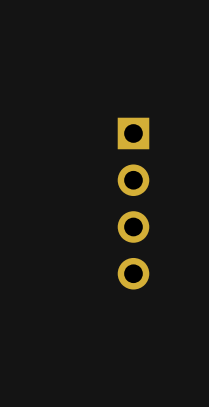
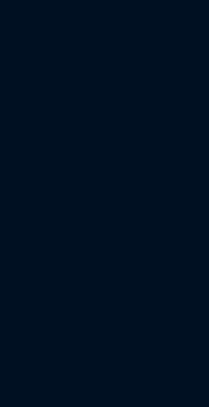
part: (133, 203) -> none

